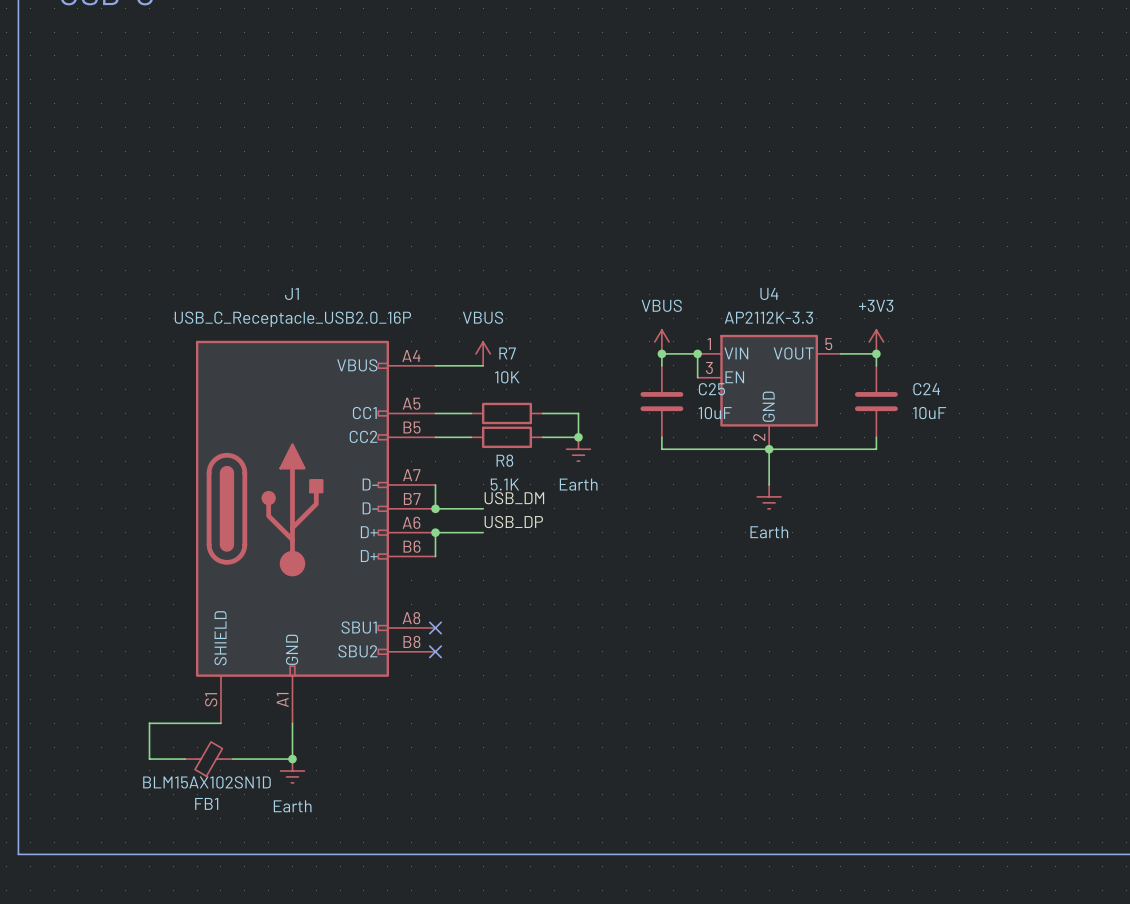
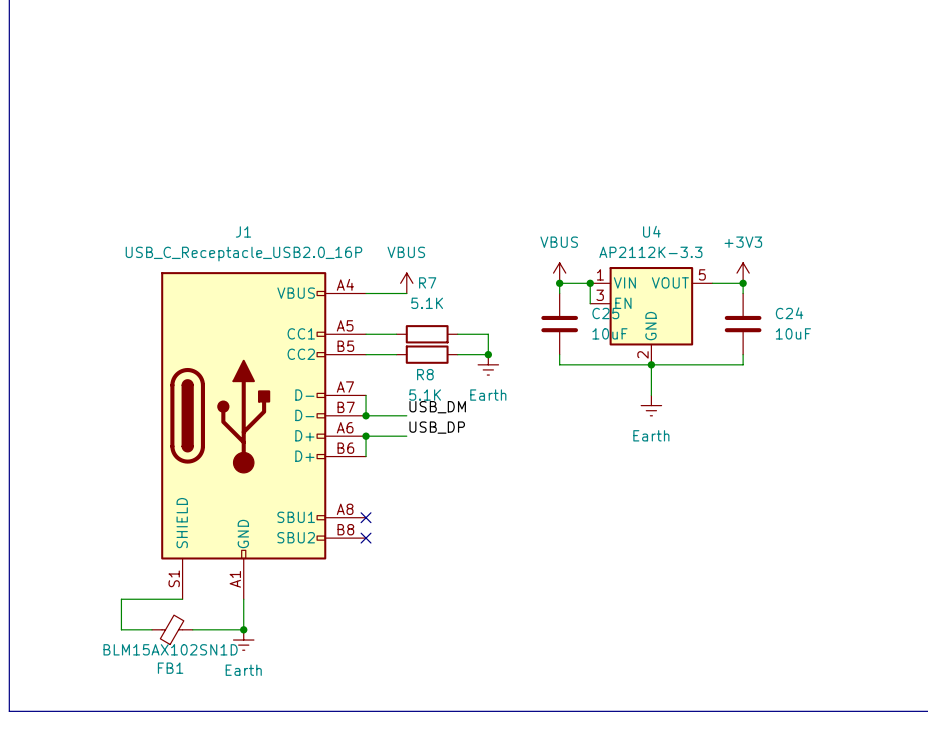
R7 value: 10K (507, 377) -> 5.1K (427, 303)

